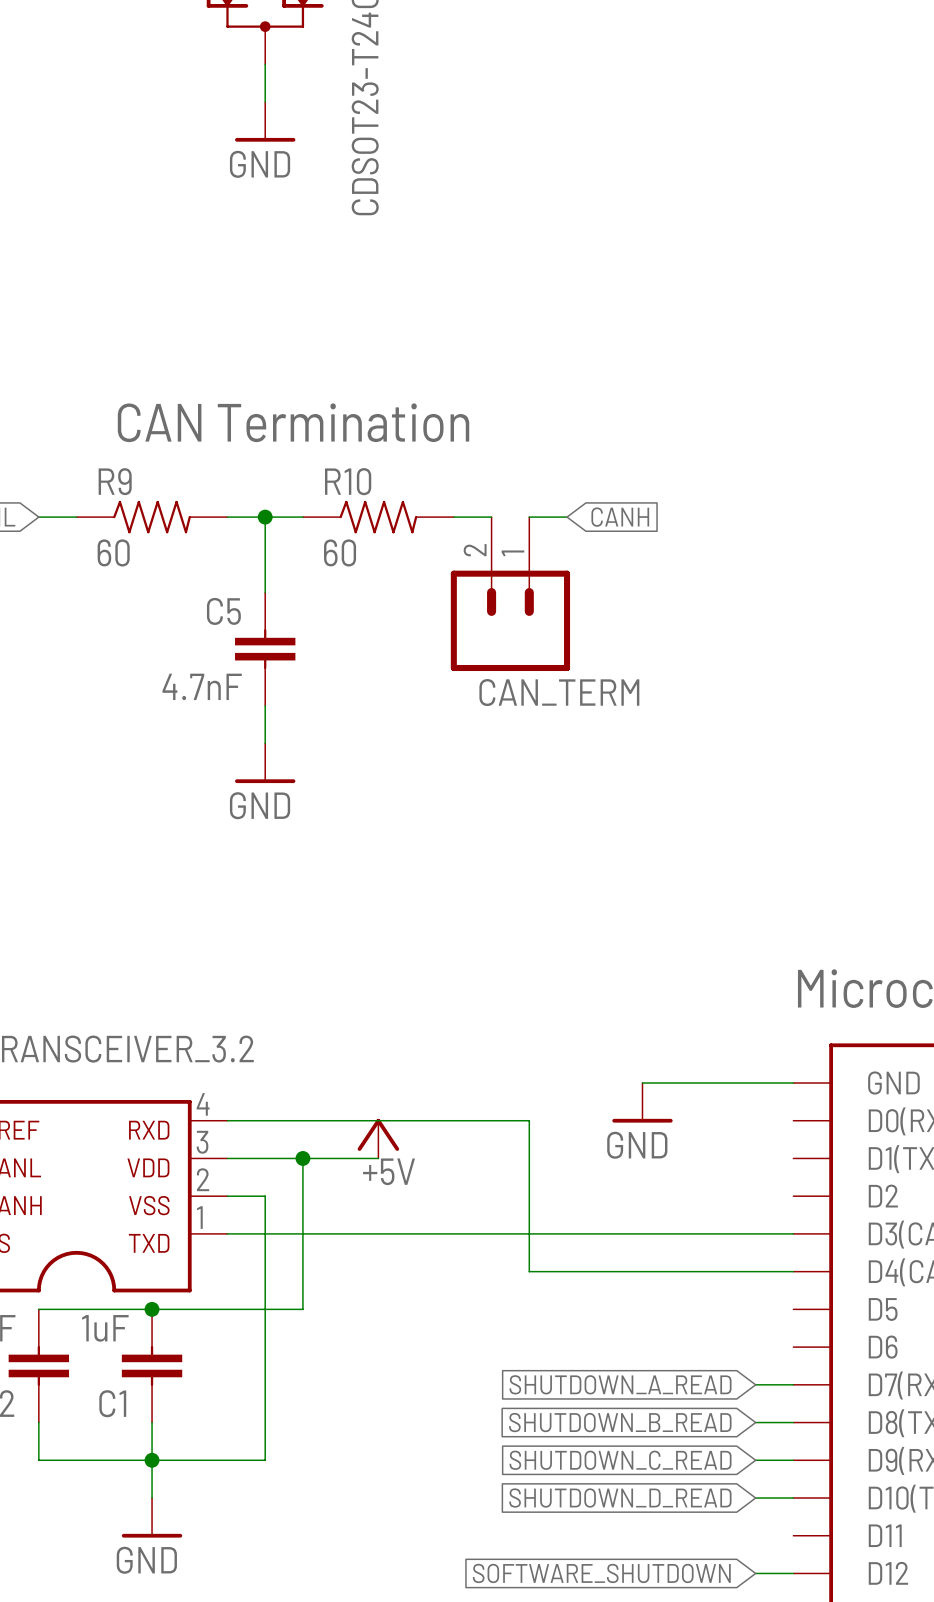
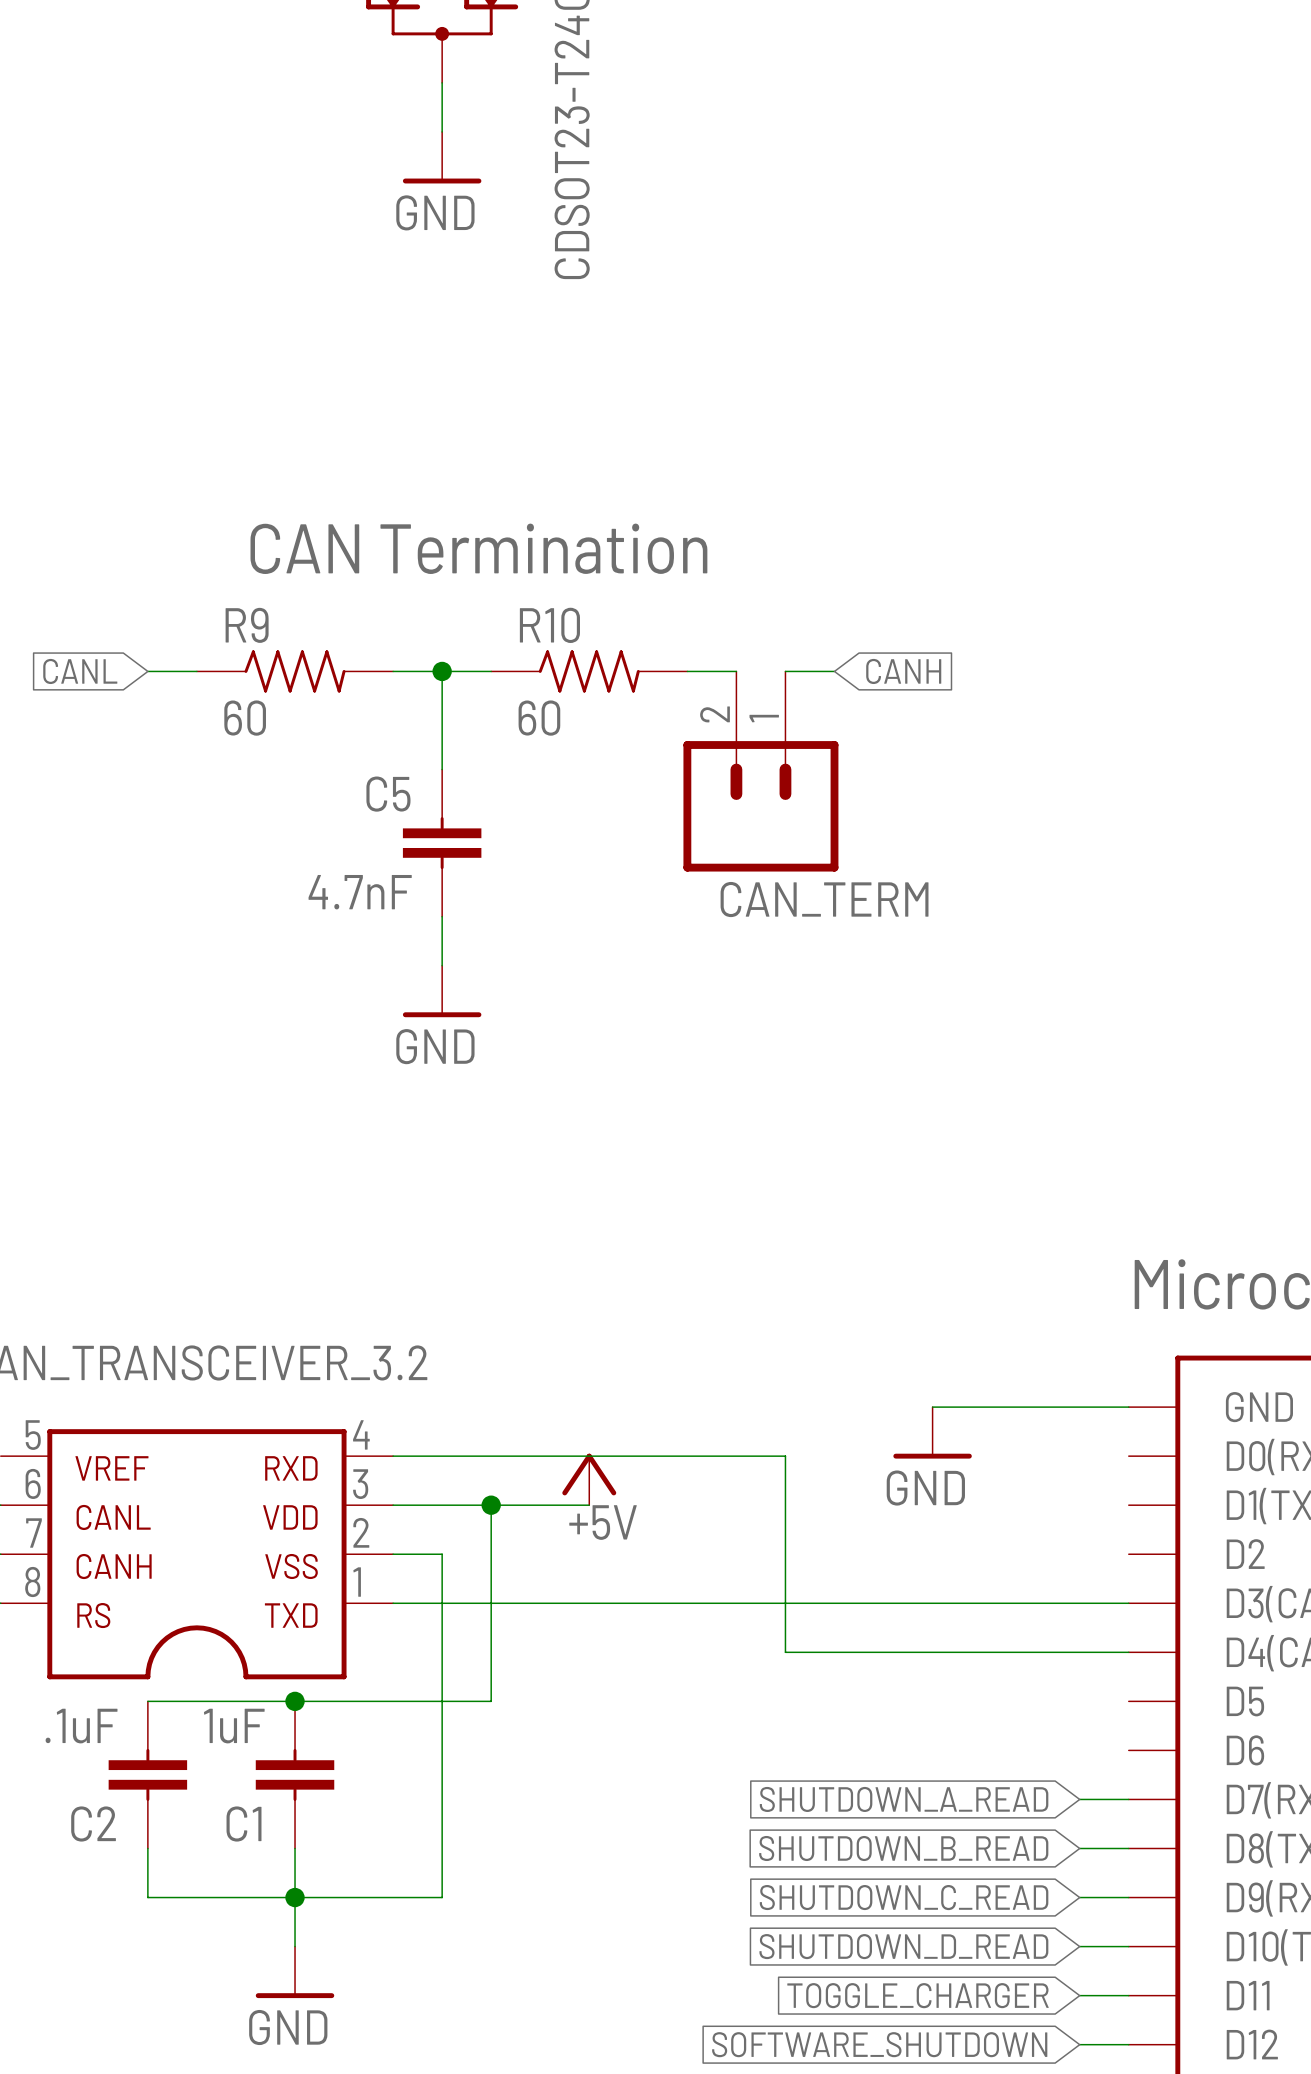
global label: none -> TOGGLE_CHARGER (918, 1995)
wire: none -> (1079, 1995) (1128, 1995)

